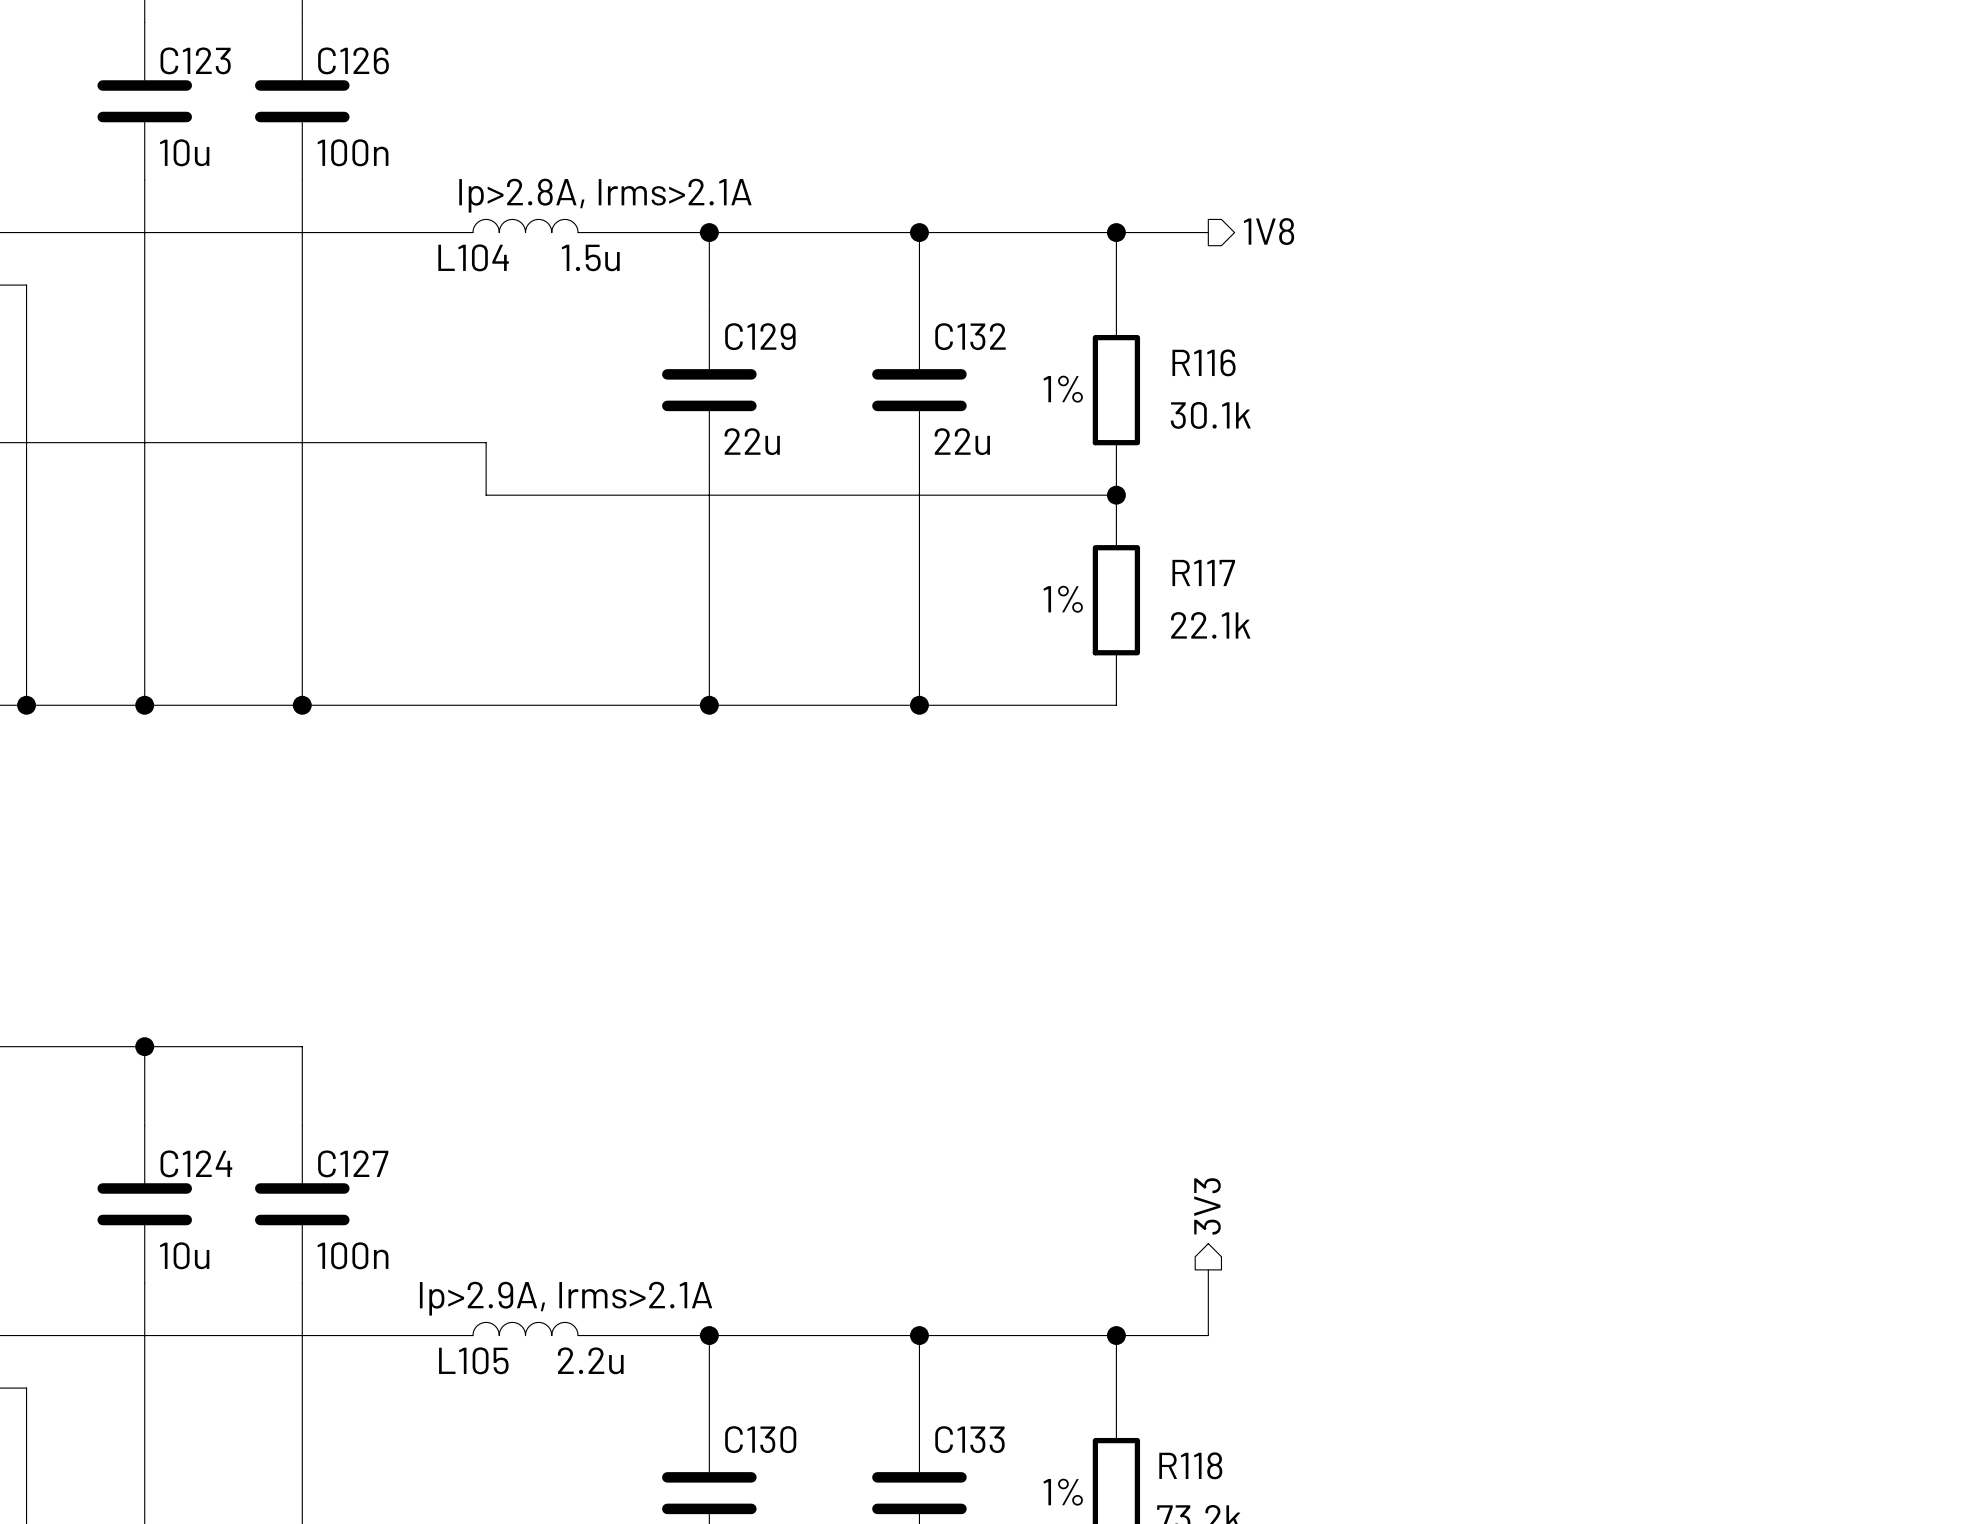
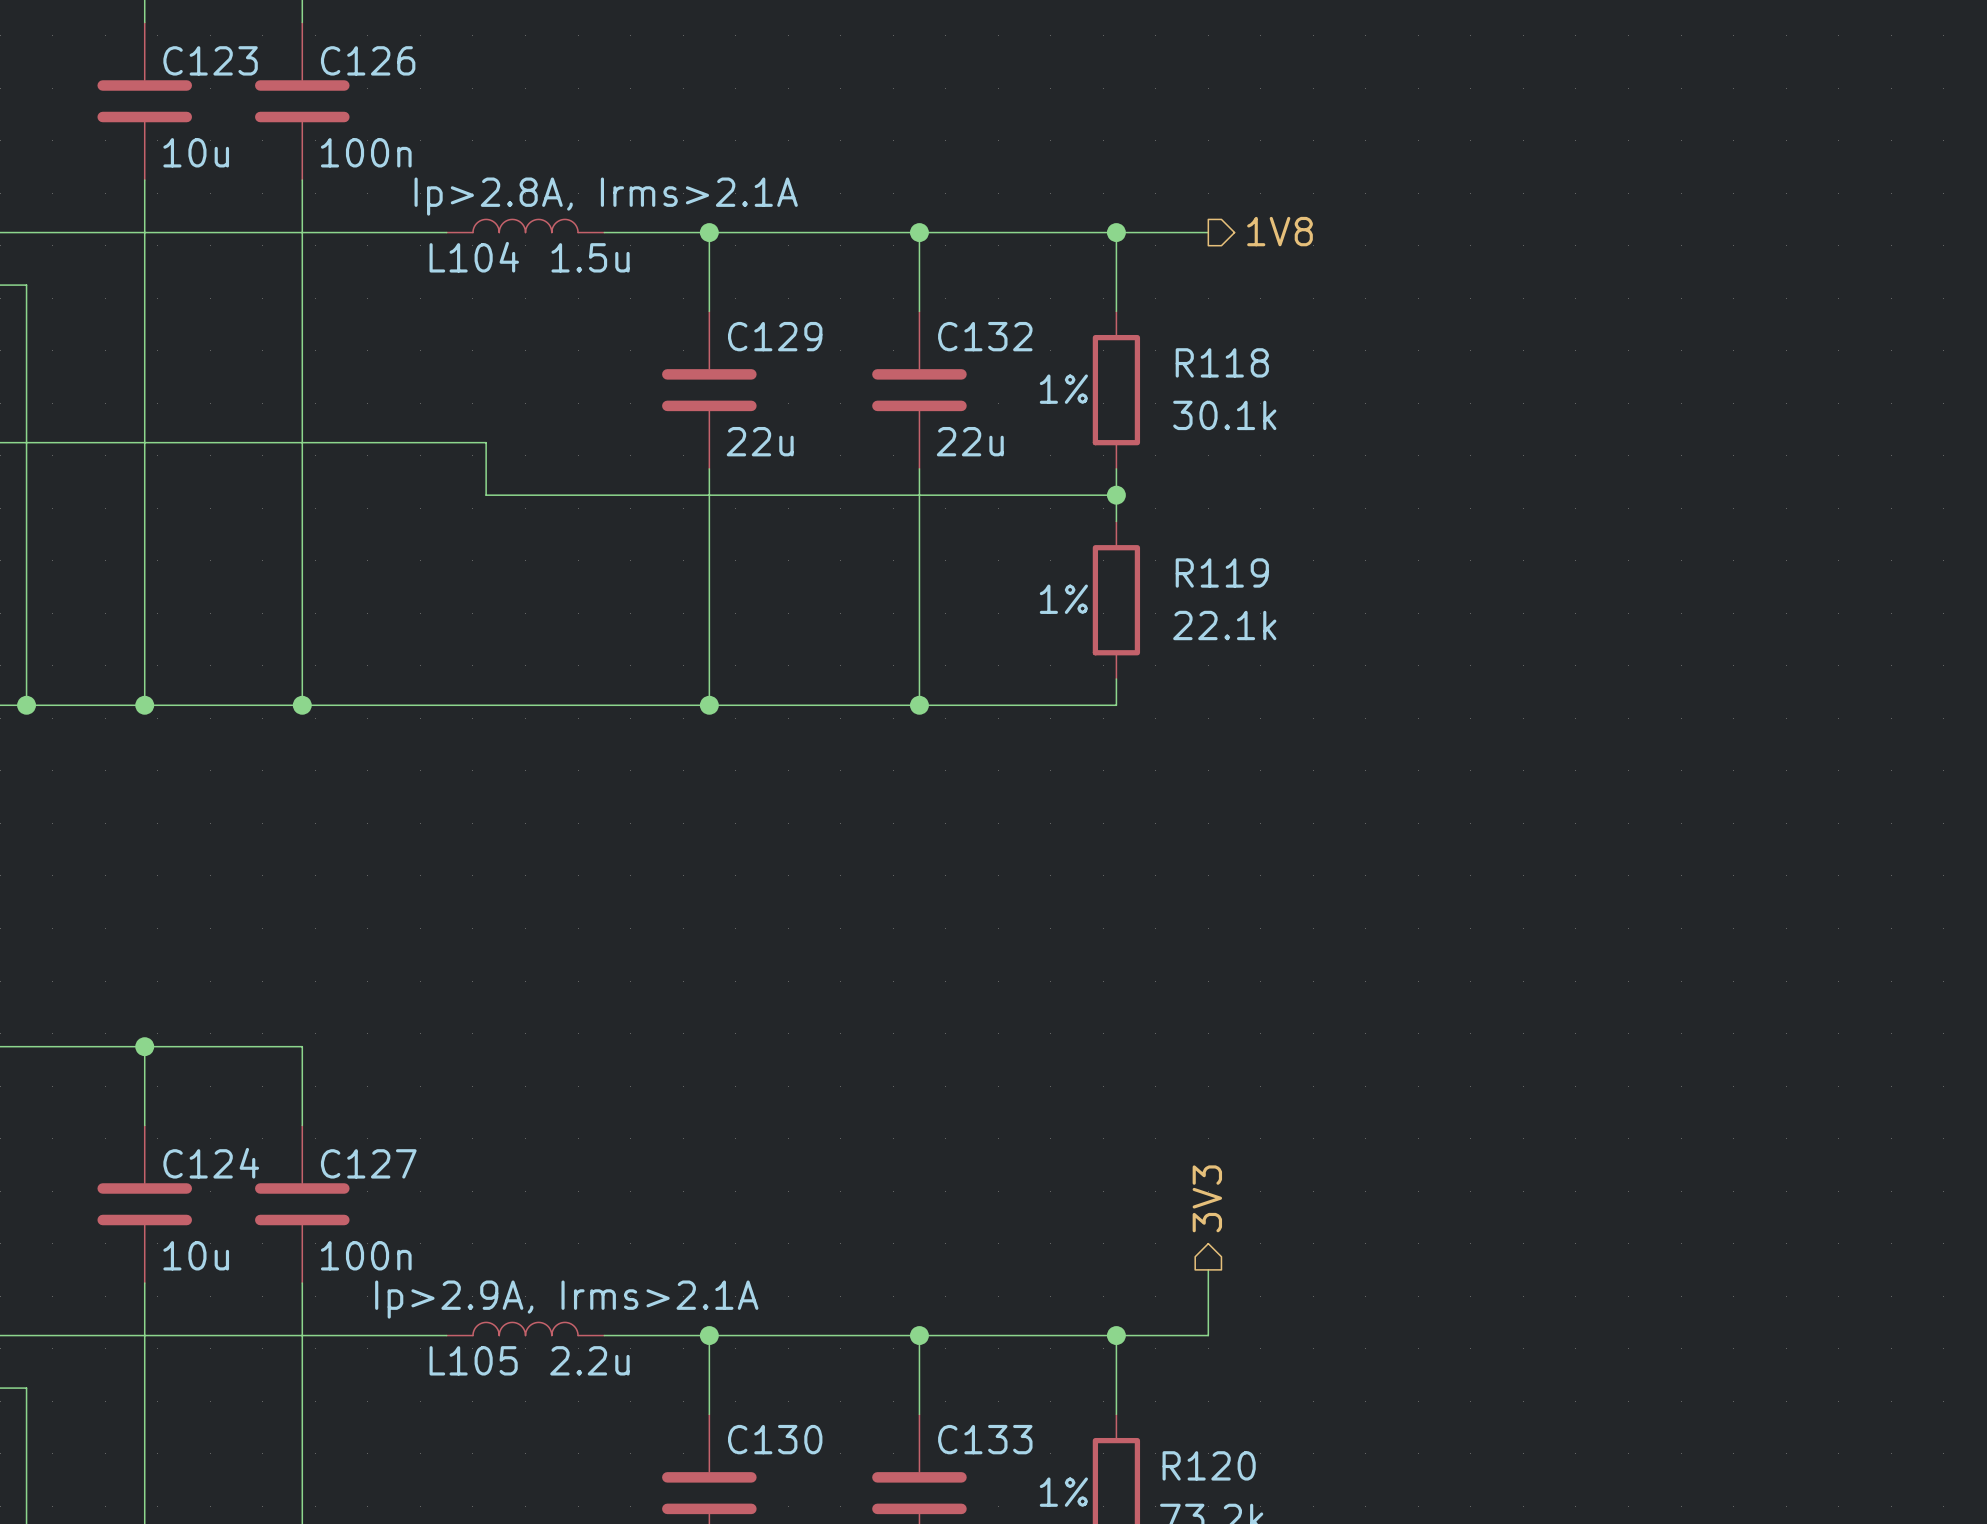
R116 name: R116 (1204, 362) -> R118 (1222, 362)
R117 name: R117 (1203, 572) -> R119 (1222, 572)
R118 name: R118 (1190, 1465) -> R120 (1209, 1465)

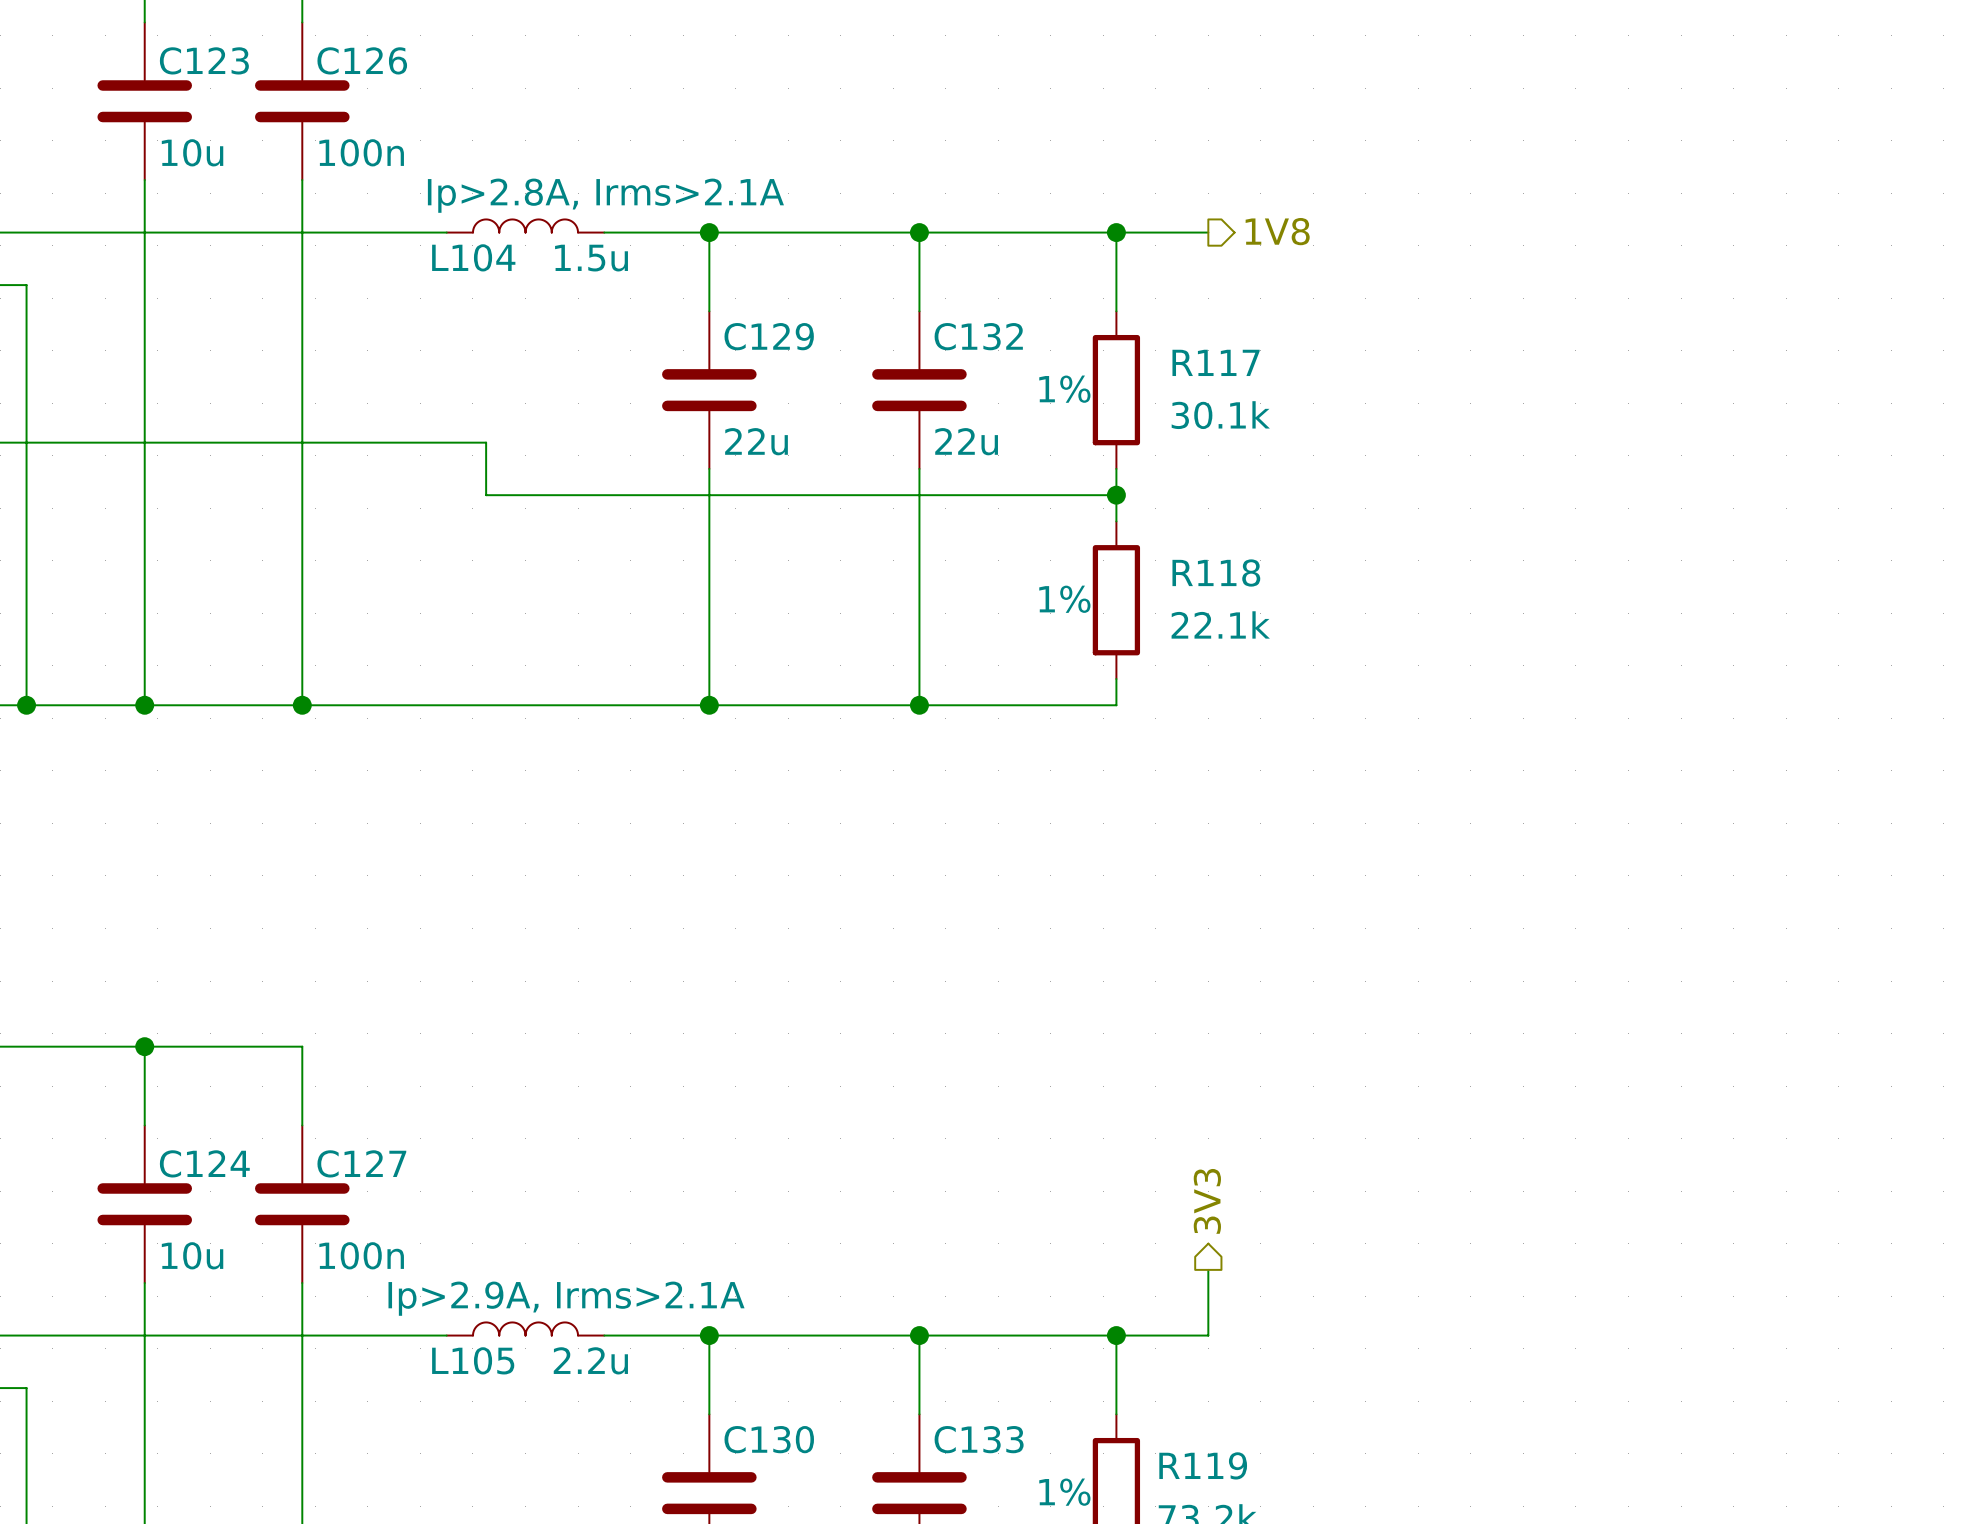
R118 name: R118 (1222, 362) -> R117 (1216, 362)
R119 name: R119 (1222, 572) -> R118 (1216, 573)
R120 name: R120 (1209, 1465) -> R119 (1203, 1465)

